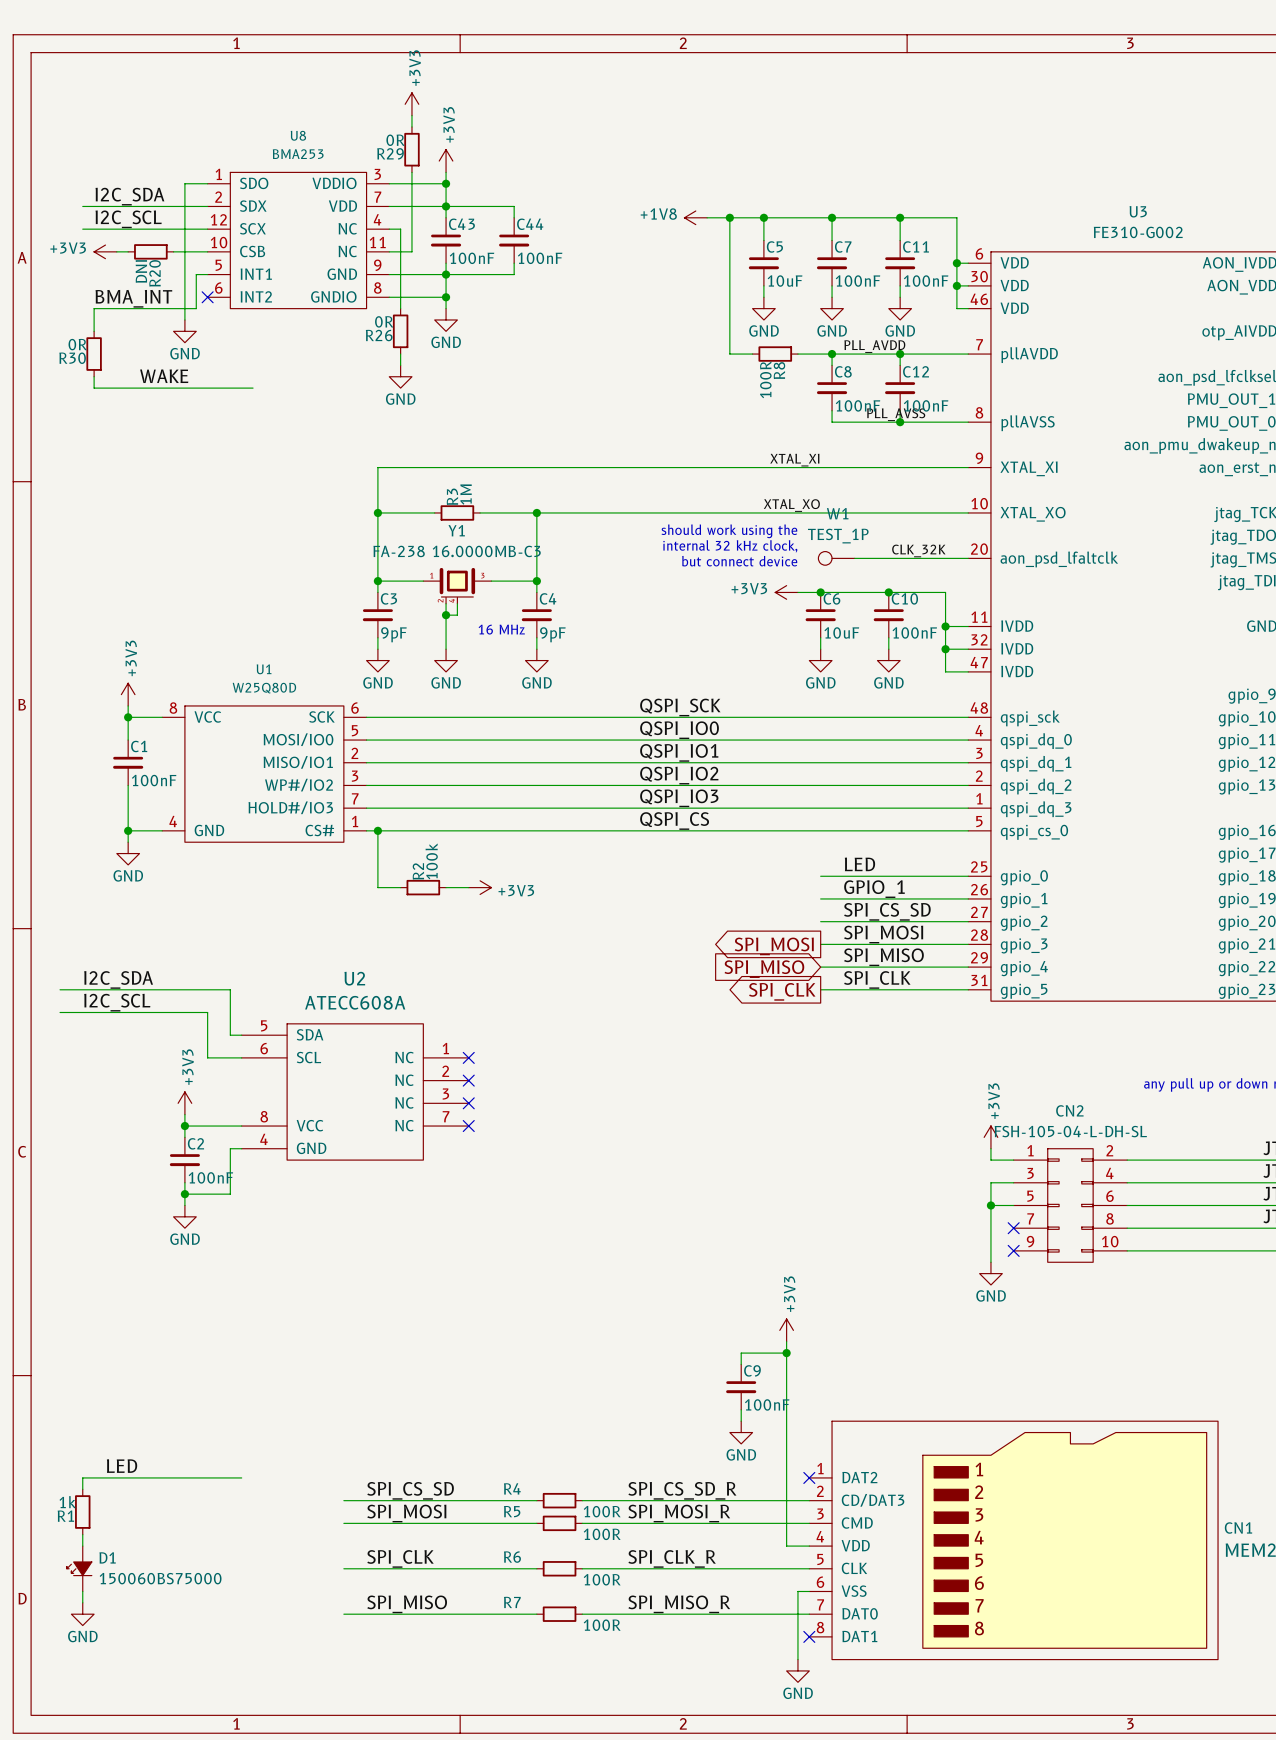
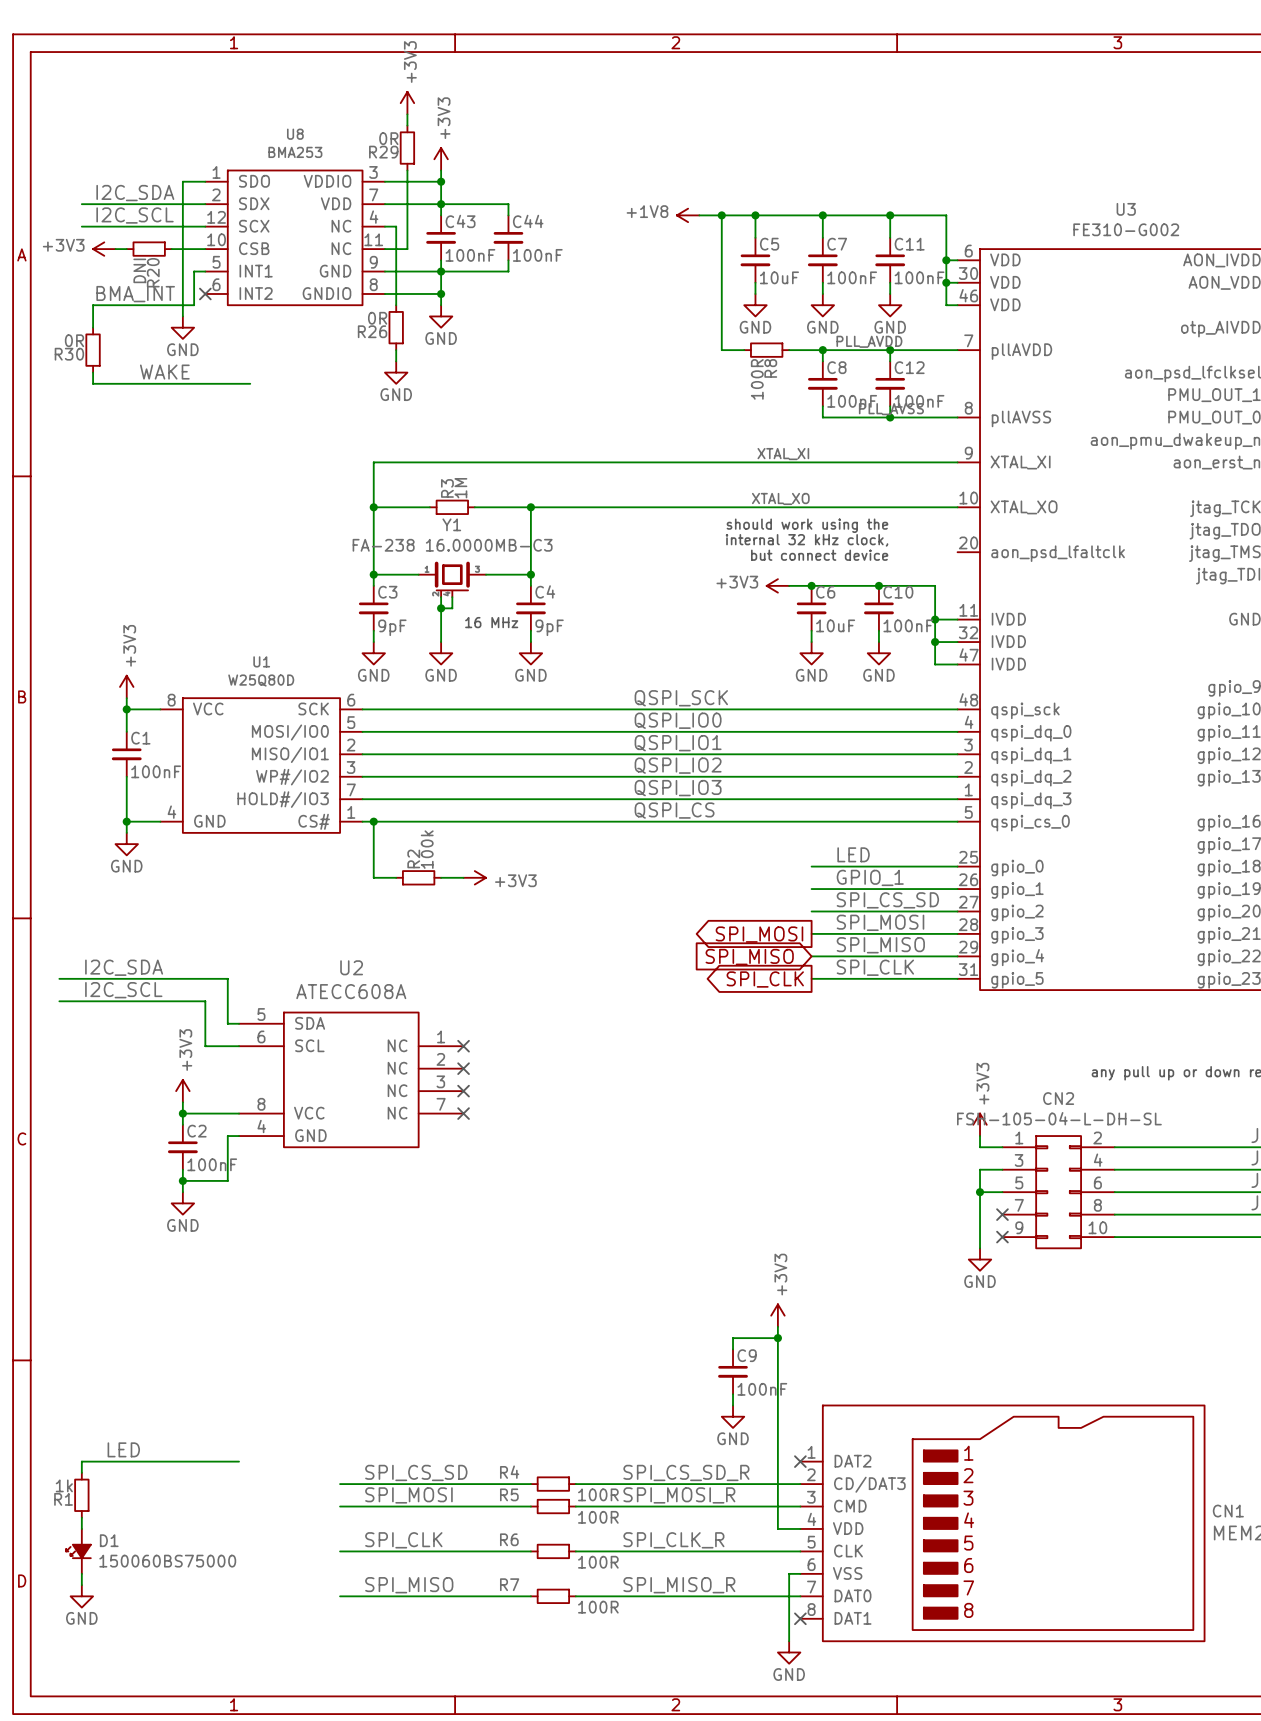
text position: should work using the (729, 531) -> should work using the (807, 525)
text position: internal 32 kHz clock, (730, 546) -> internal 32 kHz clock, (807, 540)
label: CLK_32K (918, 550) -> none
W1: TEST_1P (836, 558) -> none
wire: (854, 558) (968, 558) -> none
text position: but connect device (739, 561) -> but connect device (819, 555)

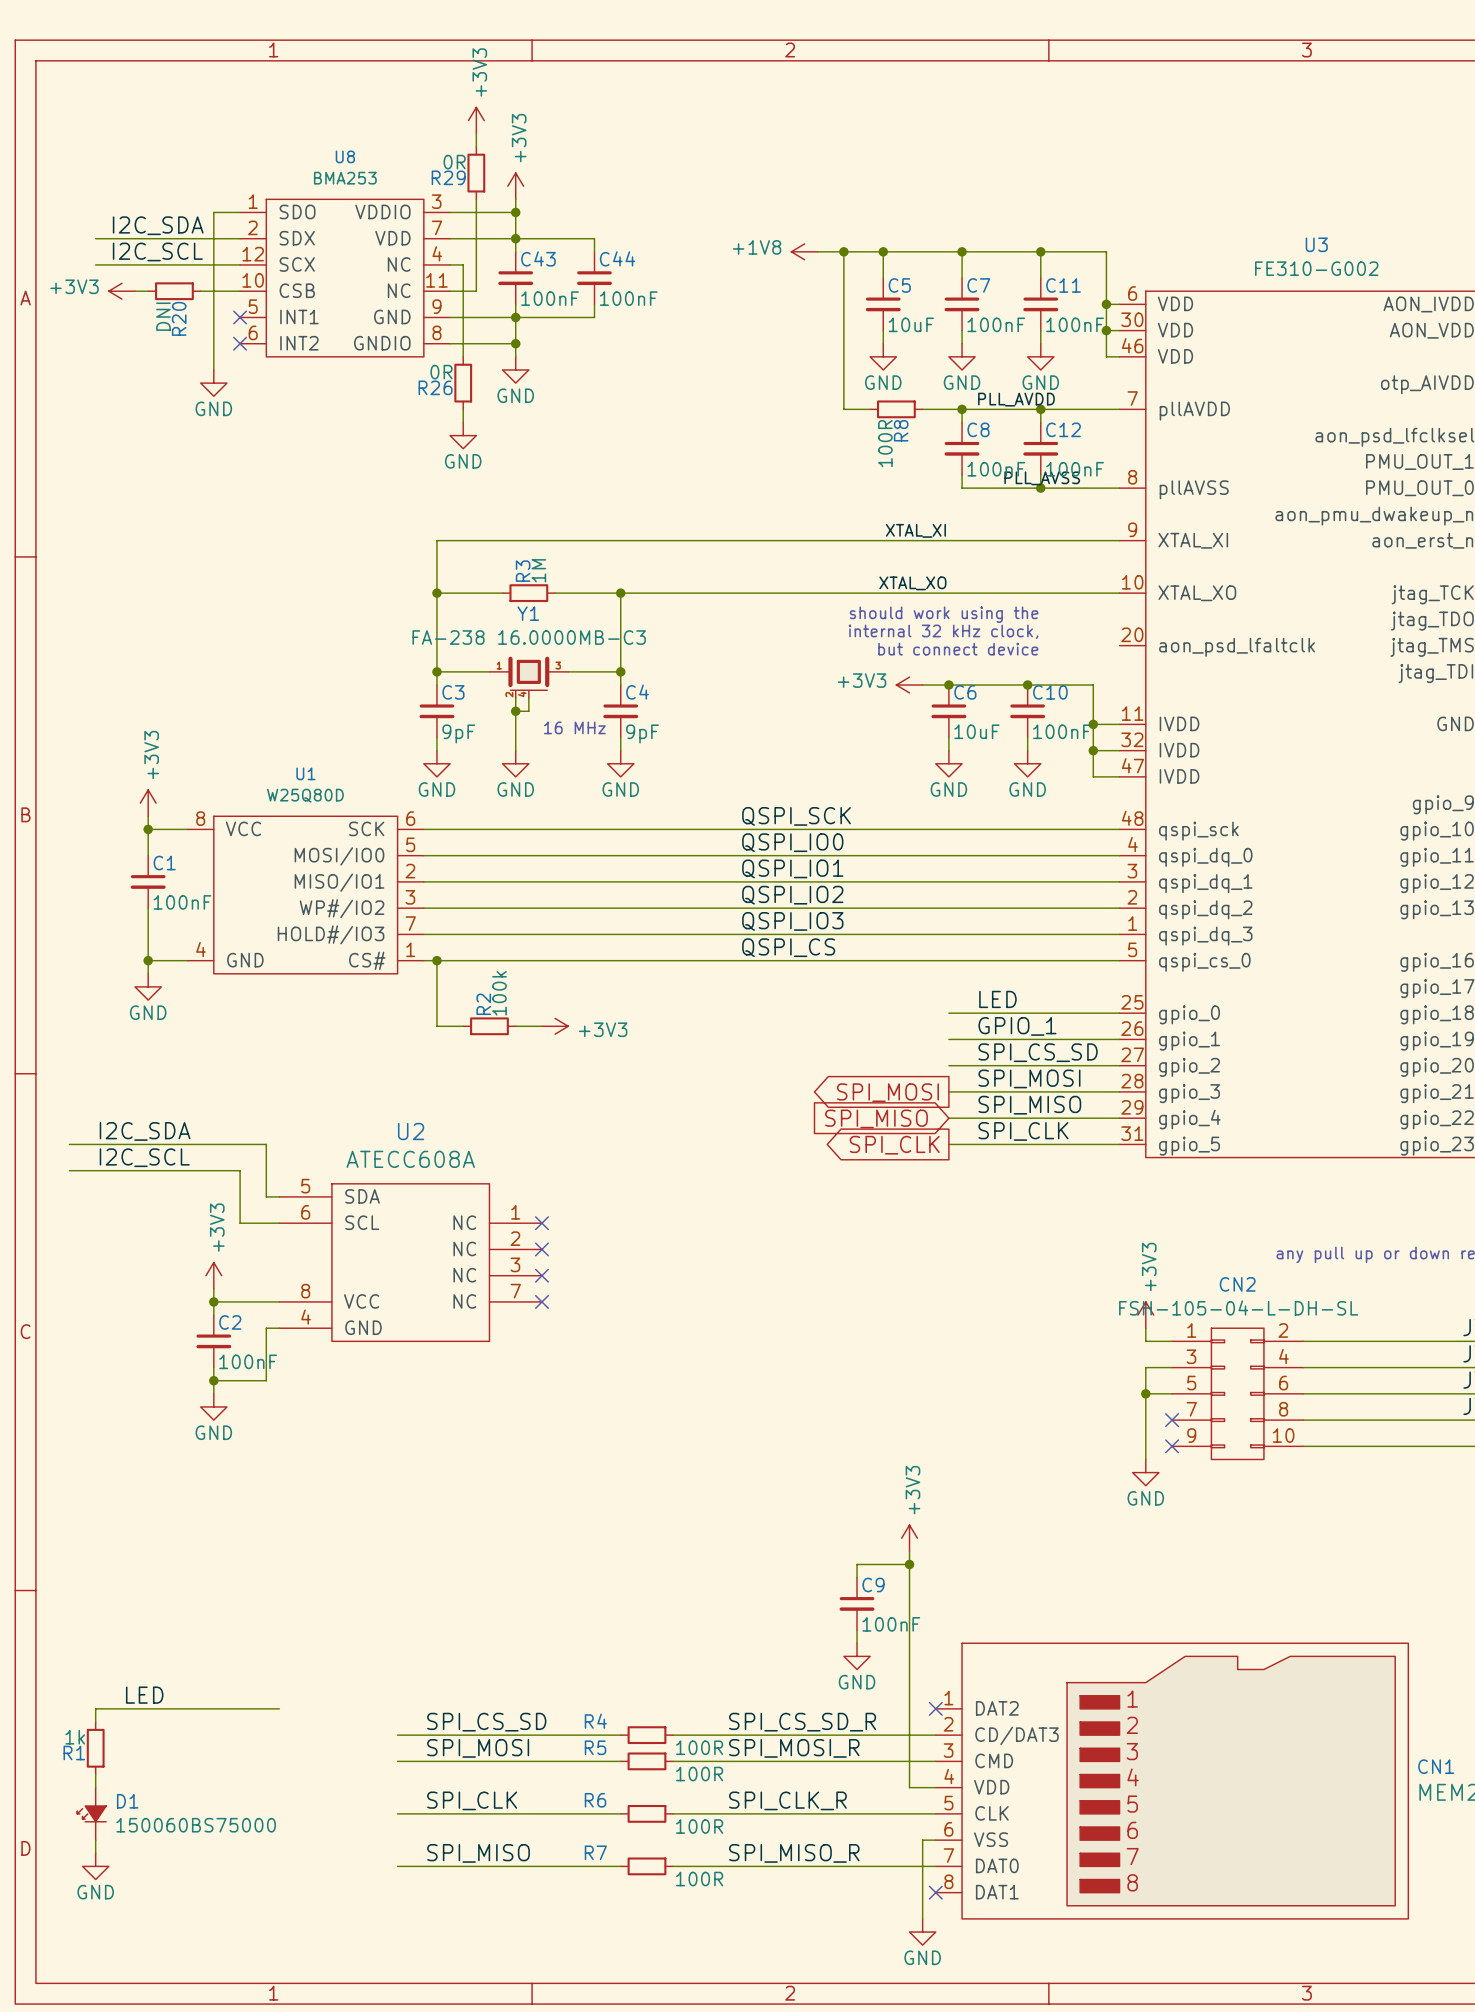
wire: (205, 271) (194, 271) (194, 305) (93, 305) (93, 327) -> none
no-connect mark: none -> (240, 317)
label: BMA_INT (135, 294) -> none
R30: 0R (93, 350) -> none
wire: (93, 372) (93, 383) (250, 383) -> none
label: WAKE (164, 372) -> none

